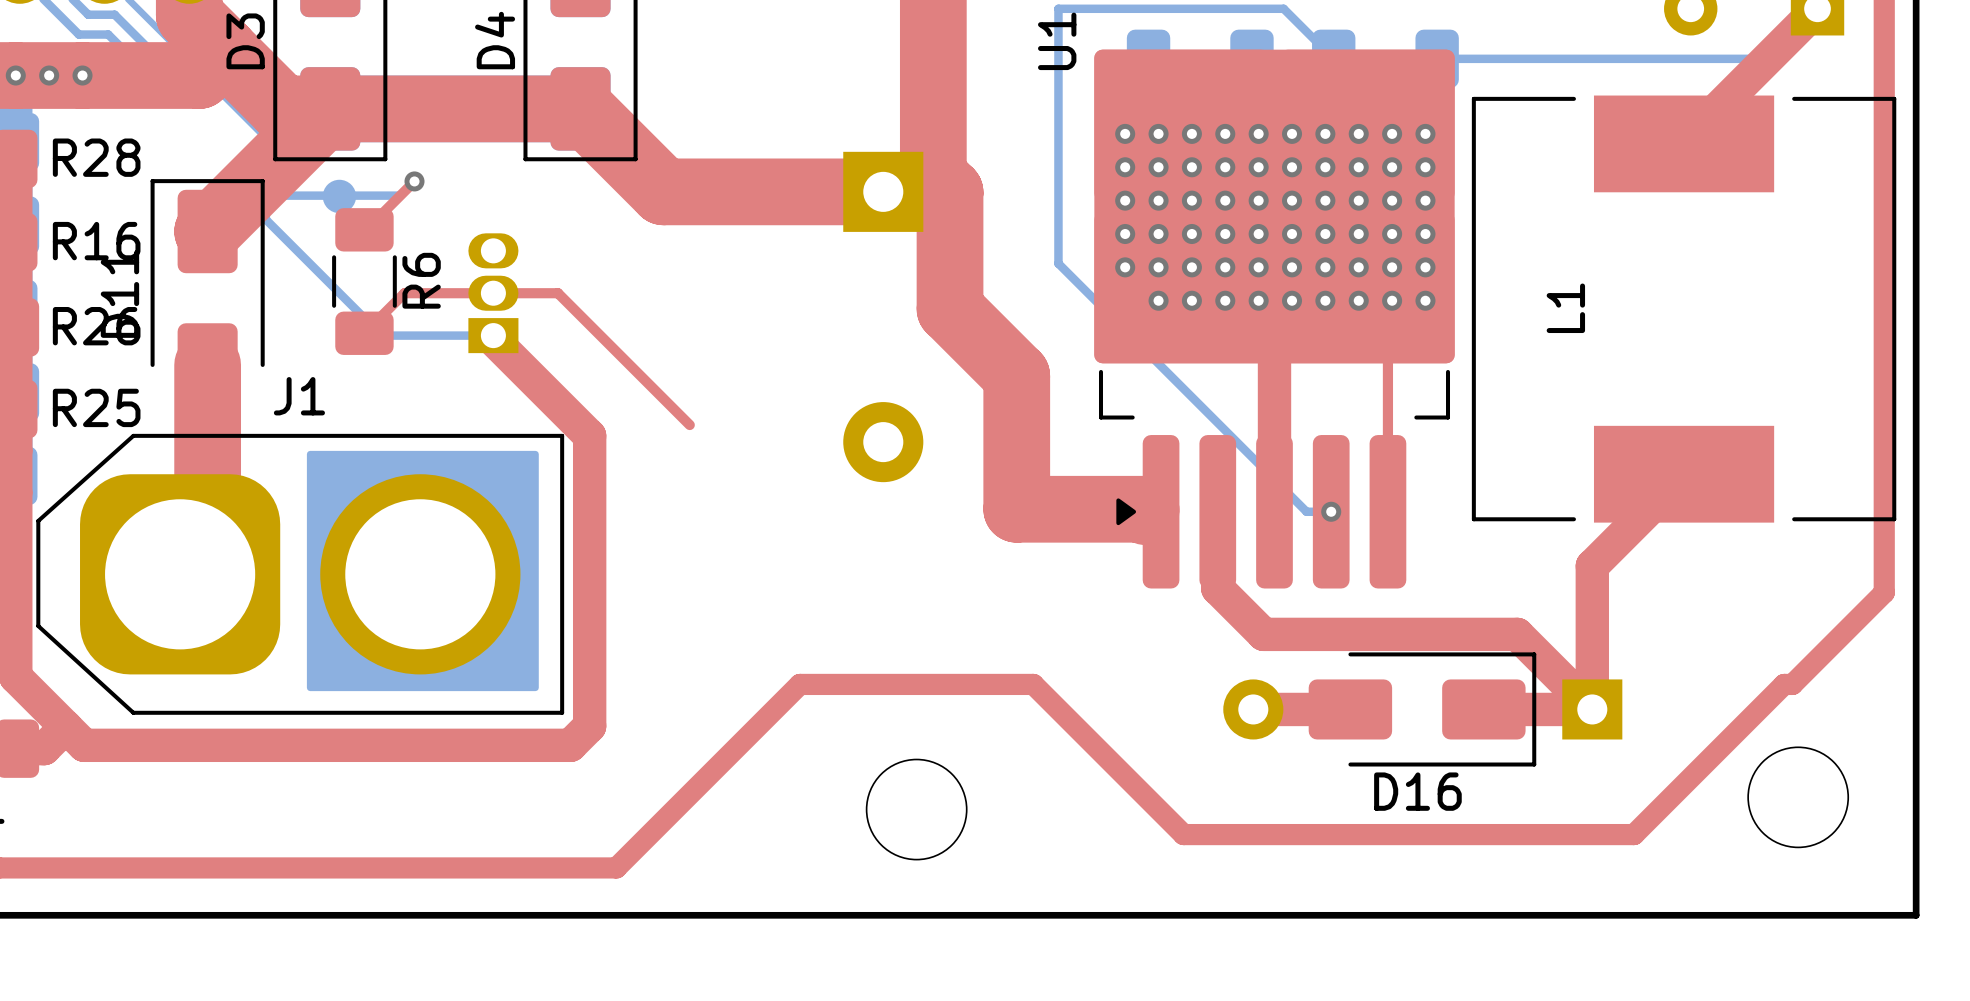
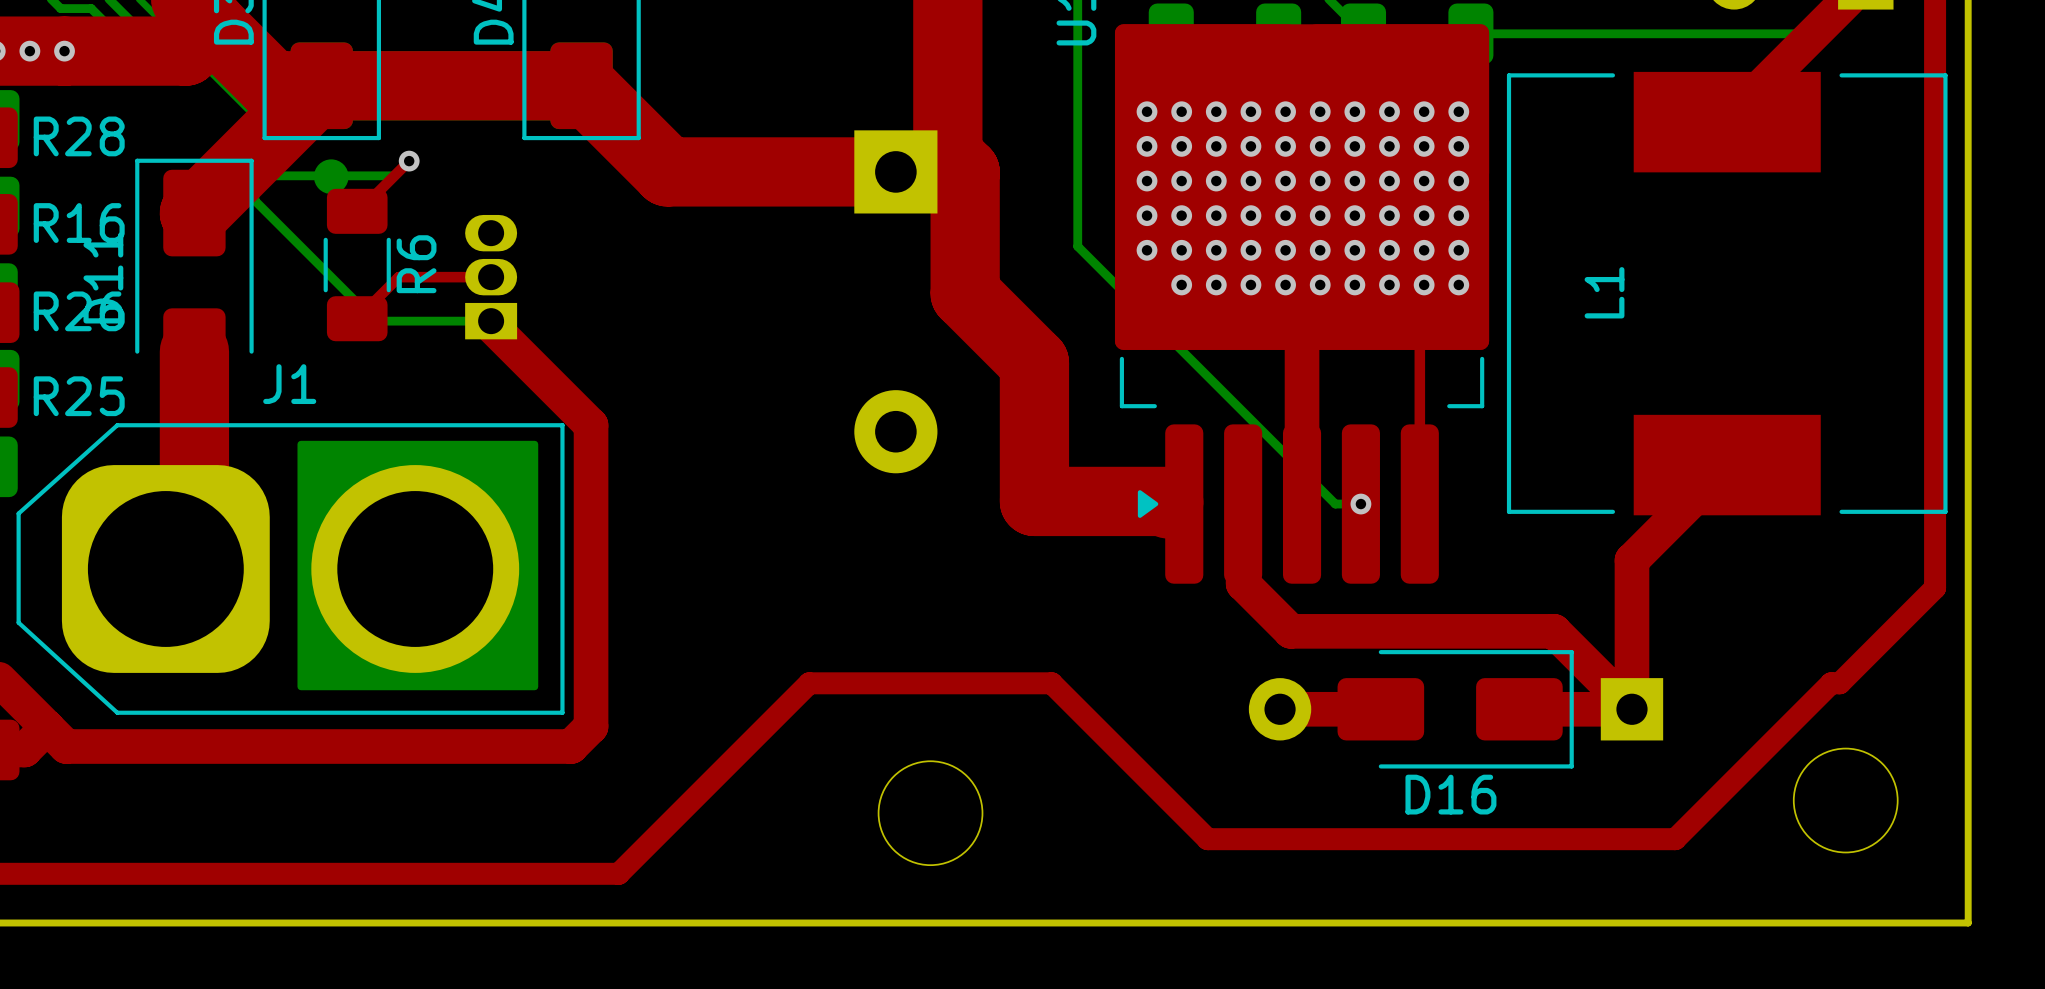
top track: (493, 293) (557, 293) (689, 425) -> none

